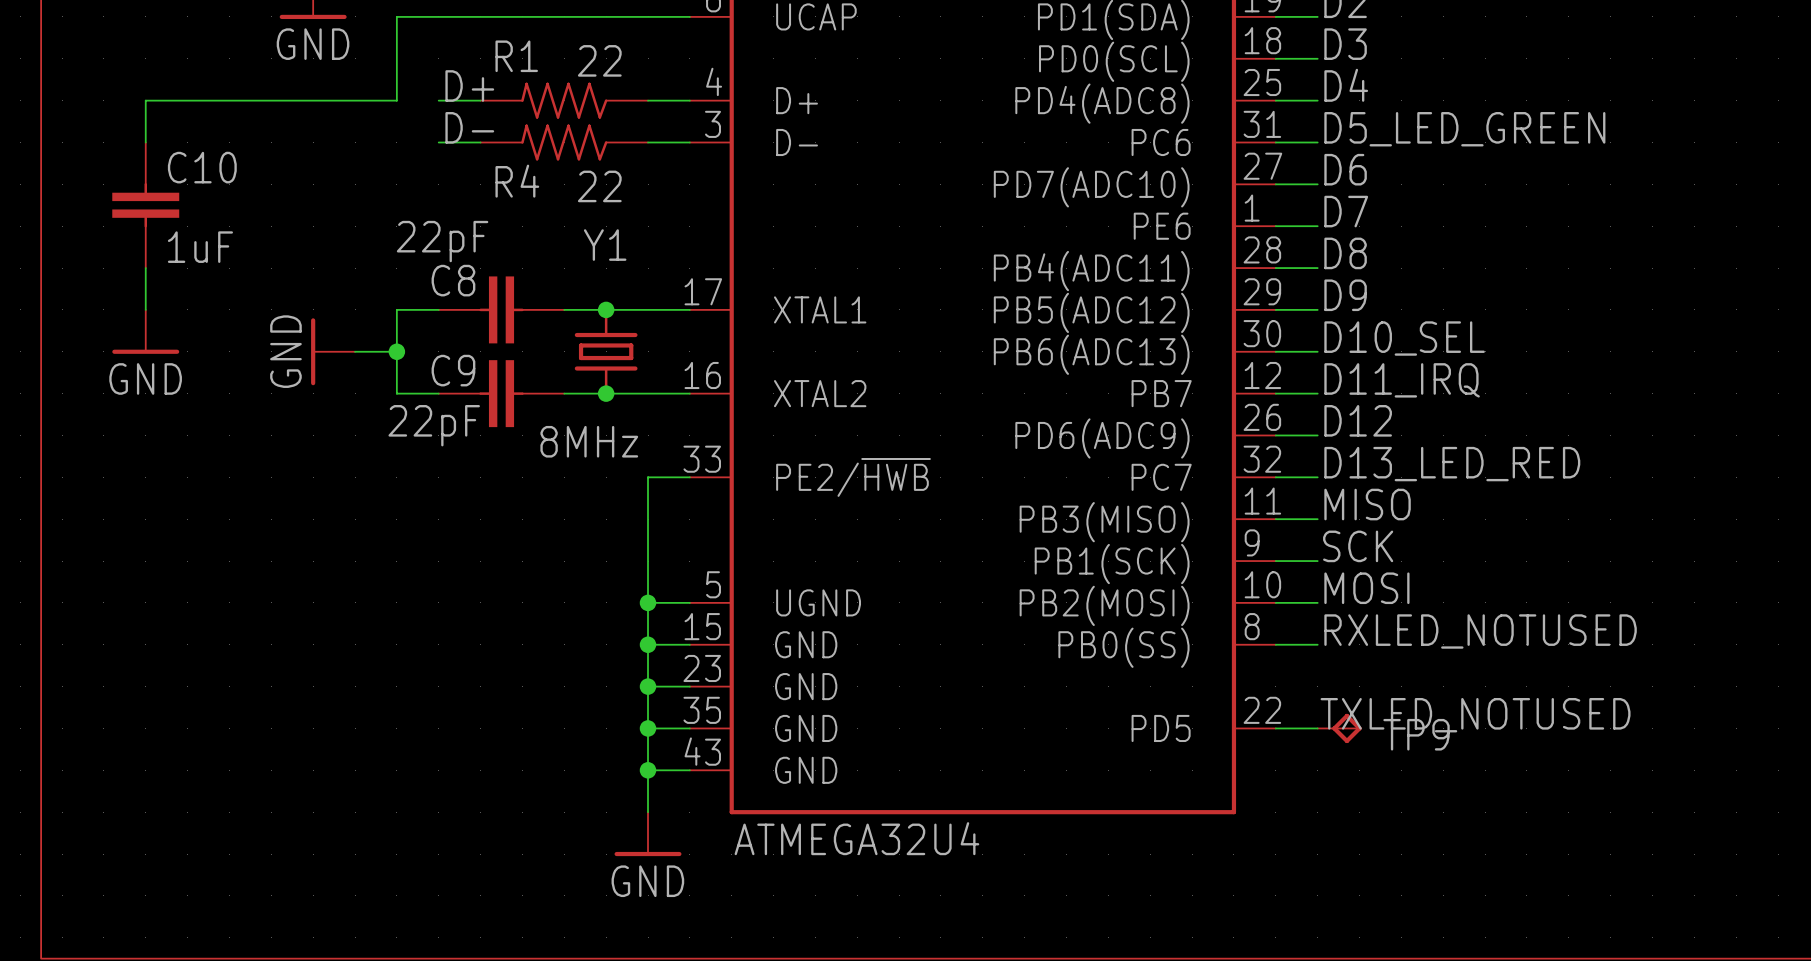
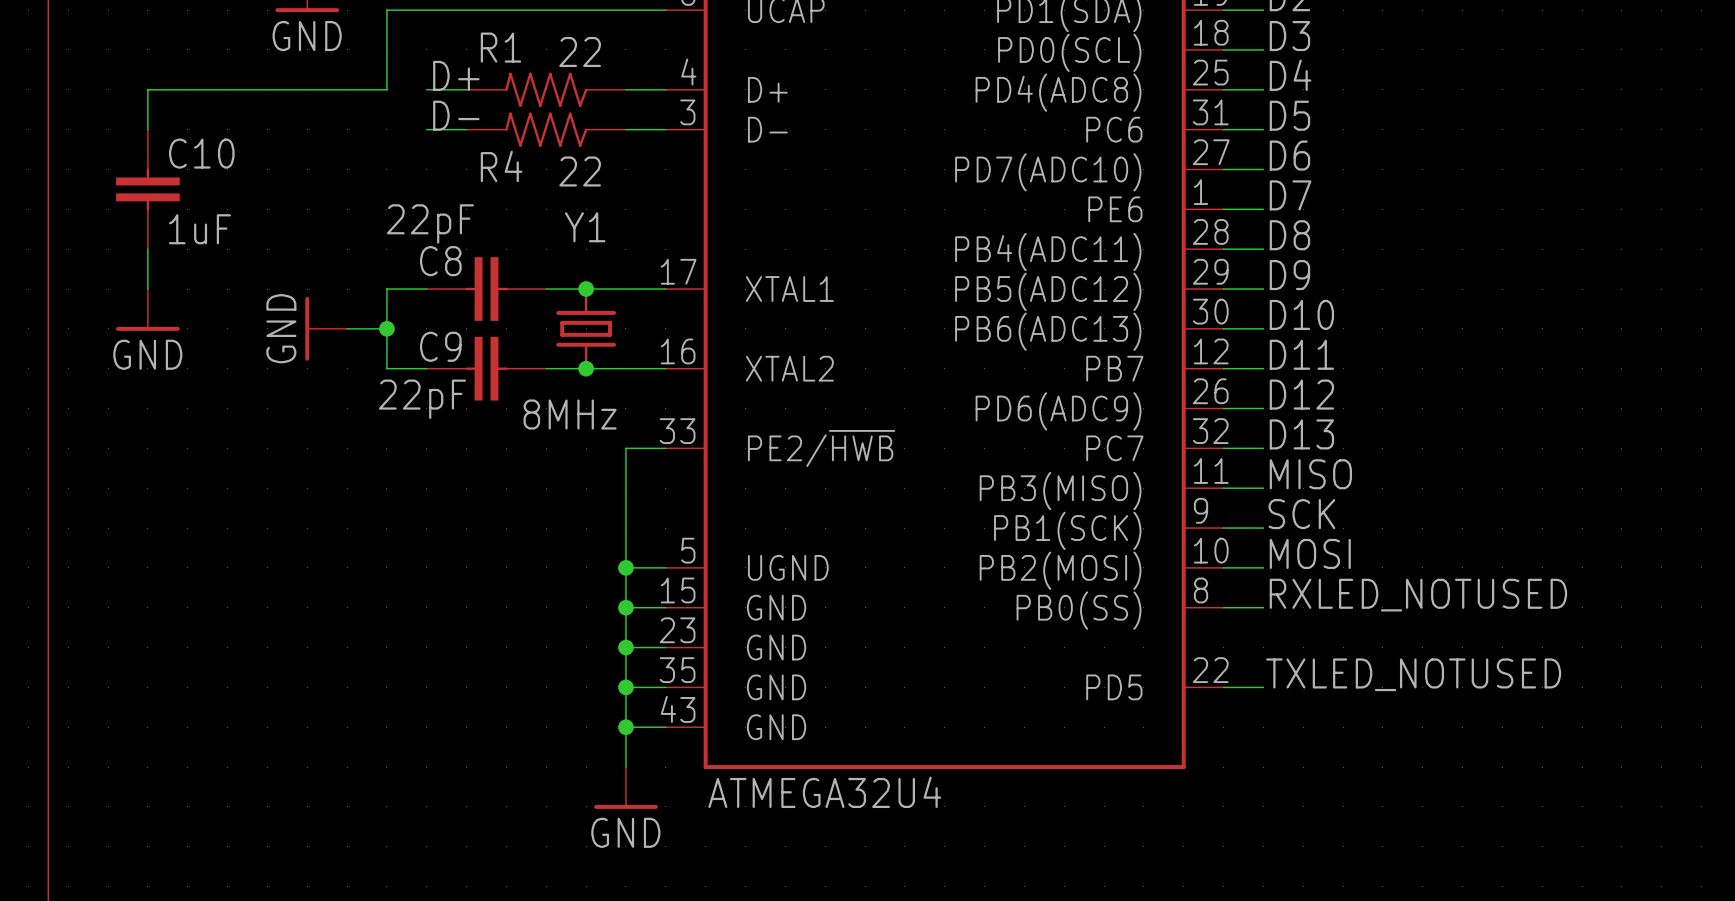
label: D5_LED_GREEN (1464, 129) -> D5 (1289, 115)
label: D10_SEL (1404, 338) -> D10 (1301, 314)
label: D11_IRQ (1402, 380) -> D11 (1301, 354)
label: D13_LED_RED (1452, 464) -> D13 (1301, 434)
TP9: (1339, 728) -> none

